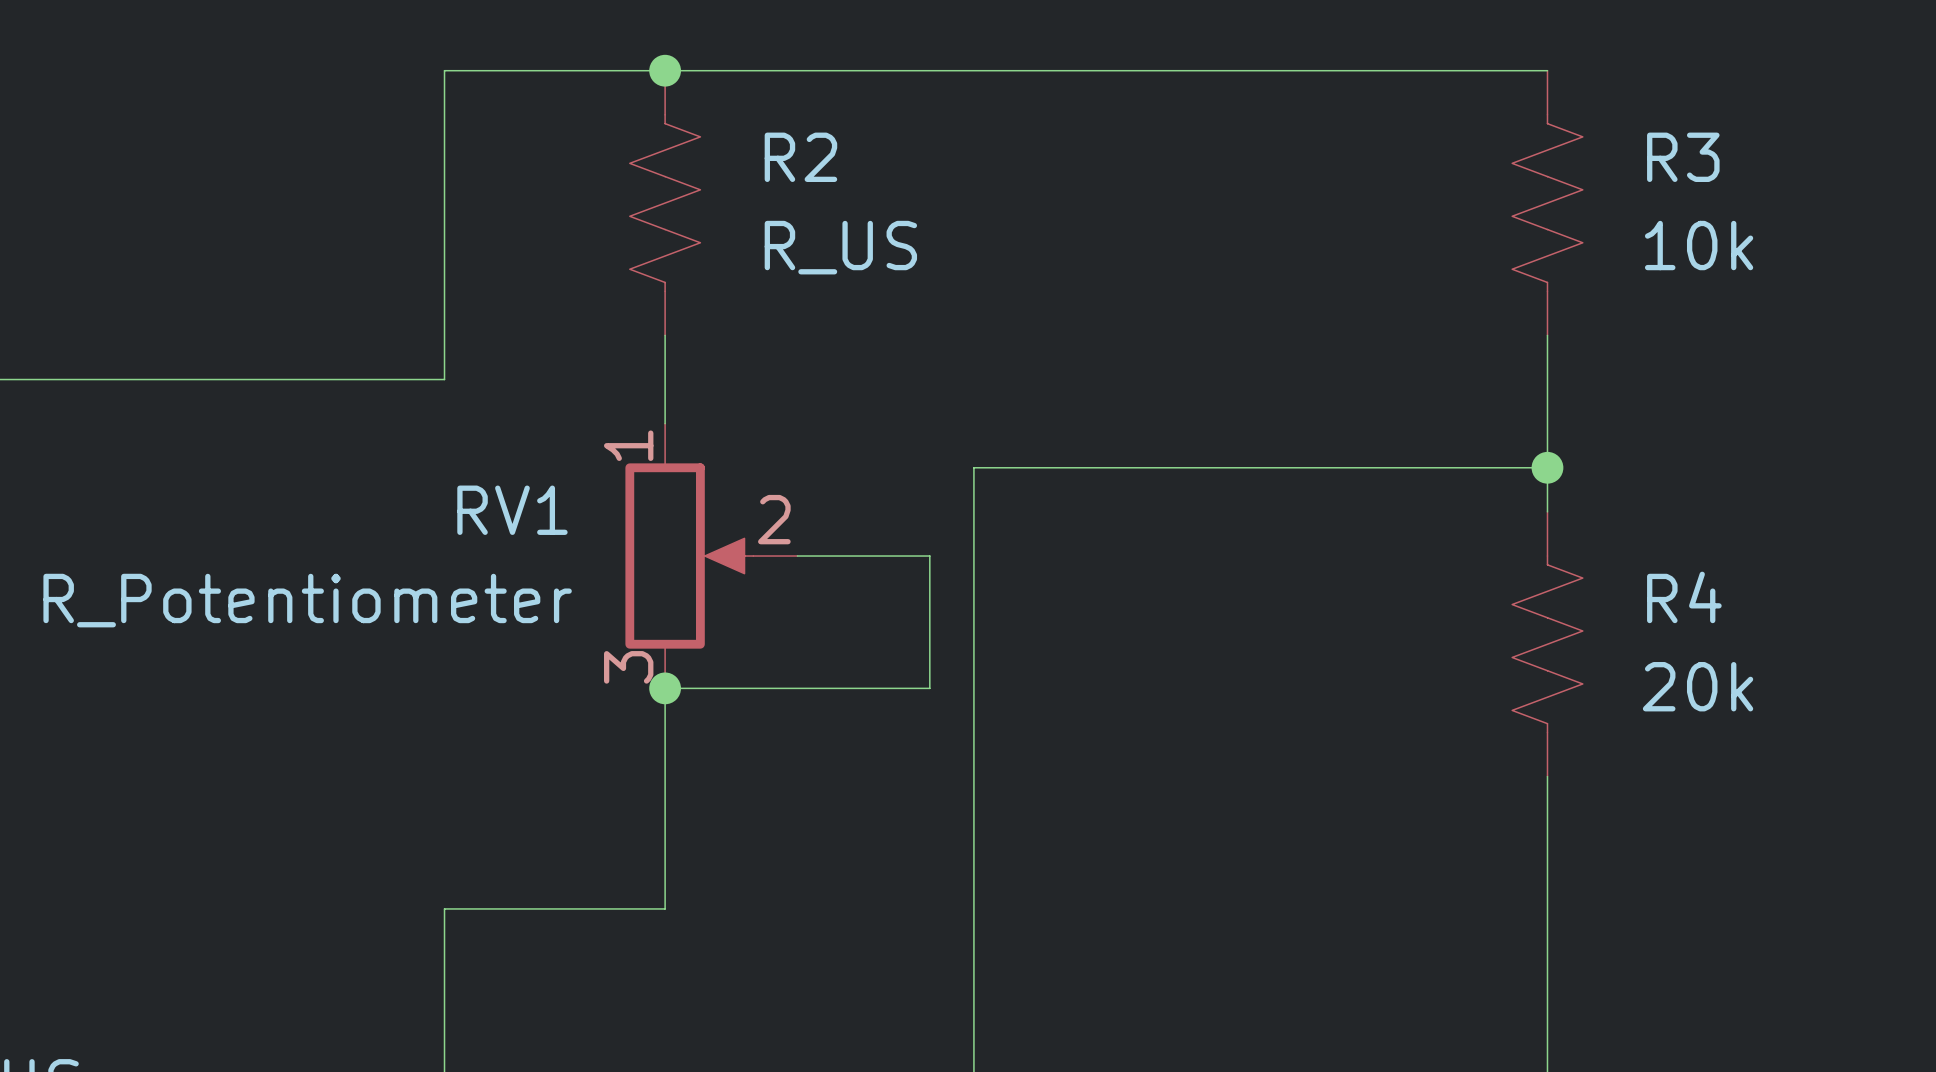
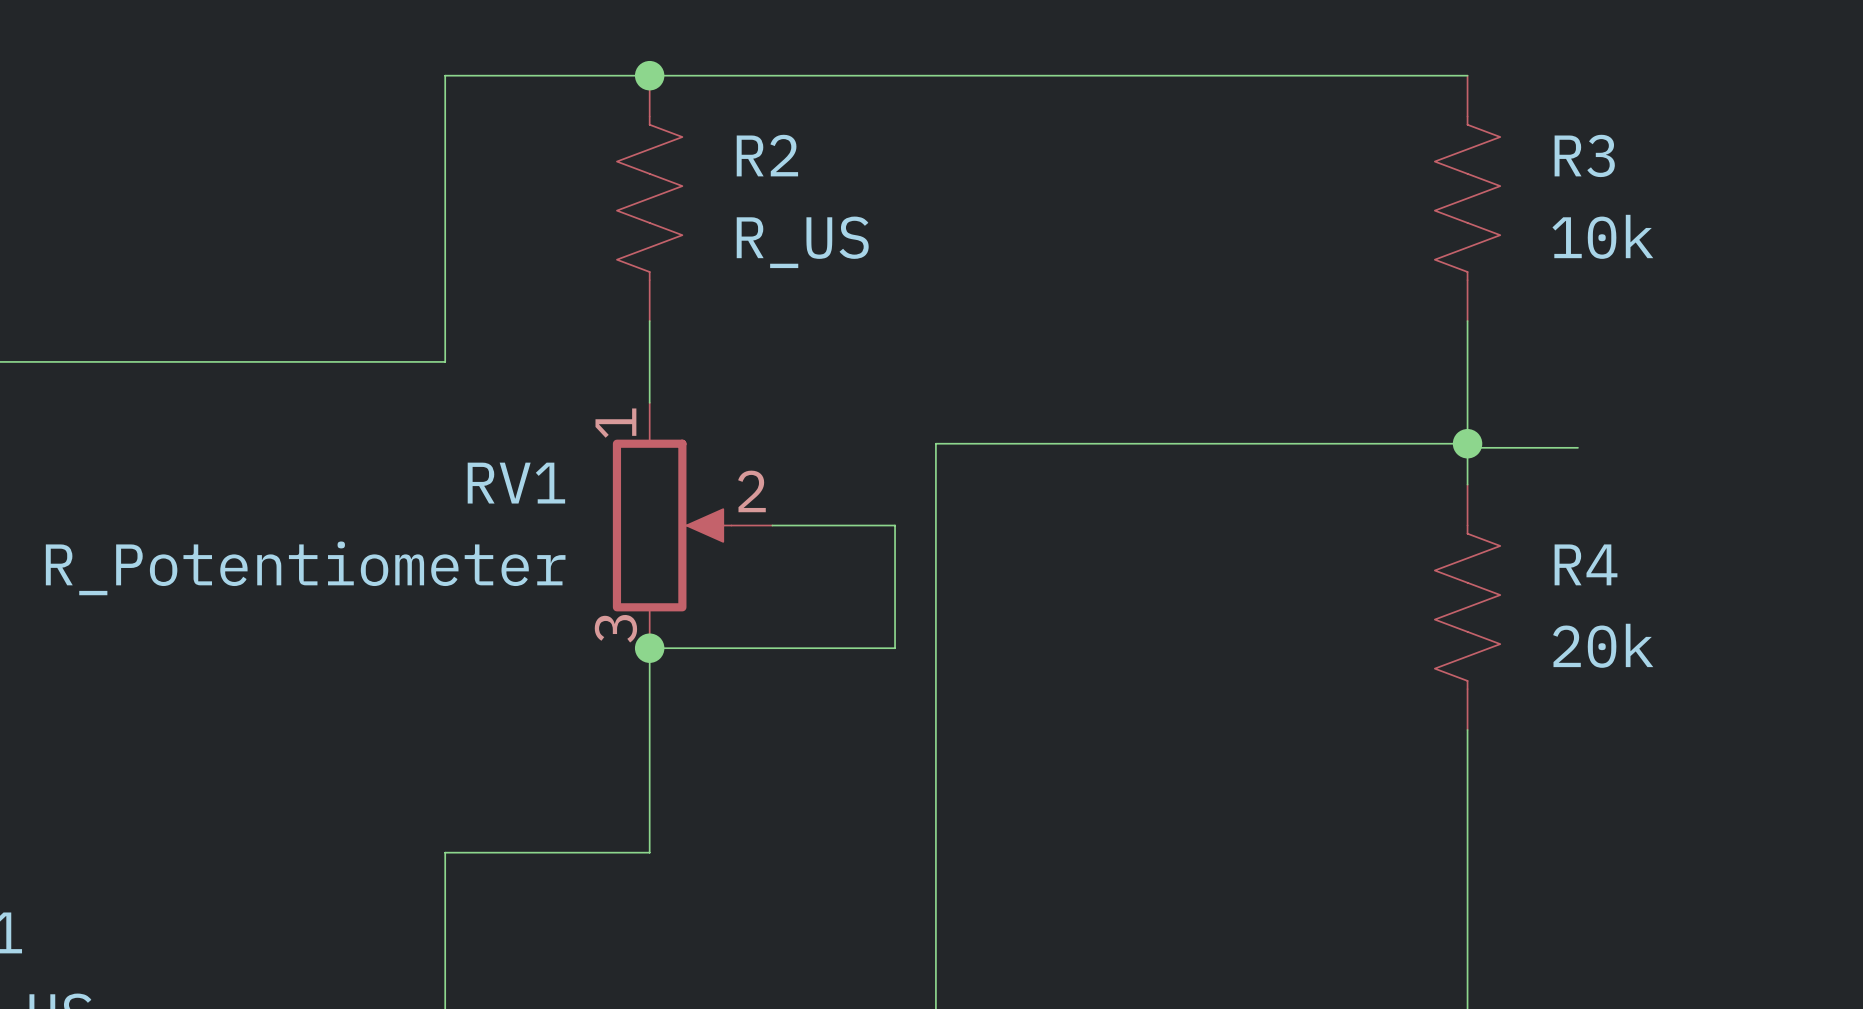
wire: none -> (1467, 447) (1577, 447)

